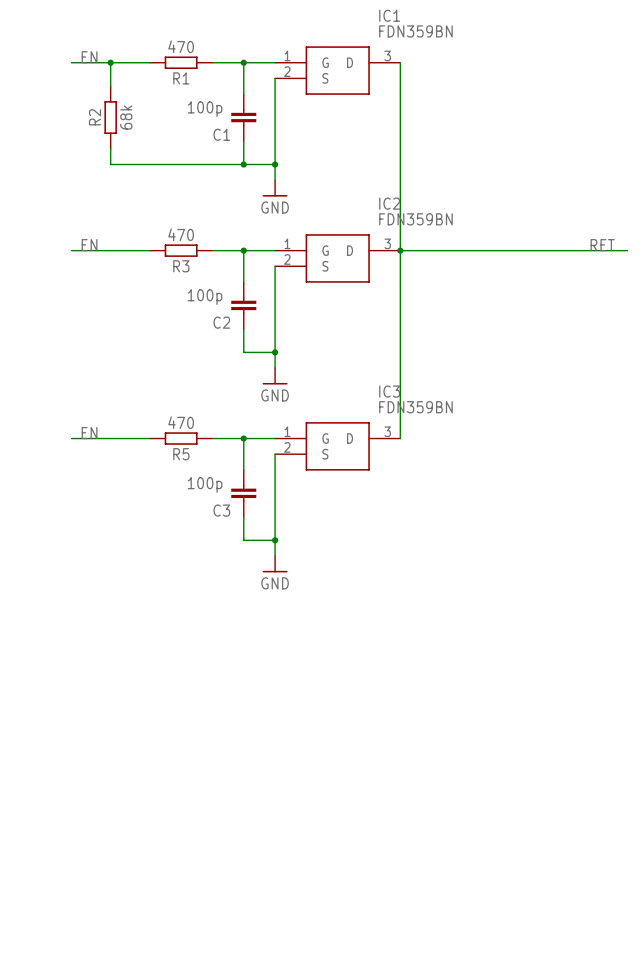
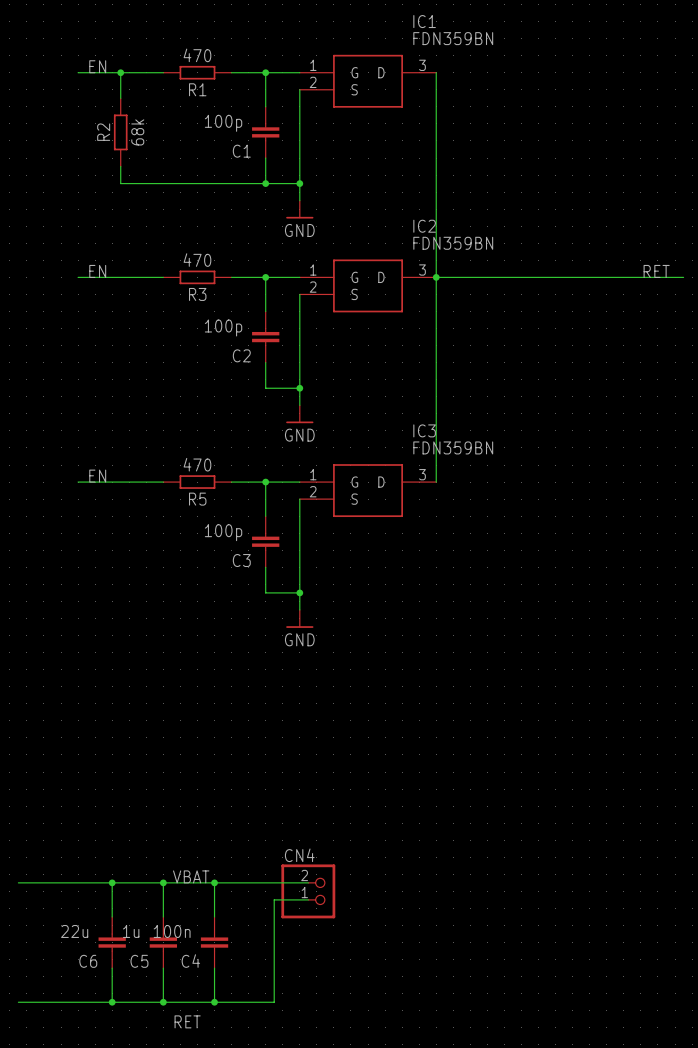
label: none -> VBAT (191, 876)
wire: none -> (18, 882) (308, 882)
wire: none -> (112, 882) (112, 916)
junction: none -> (112, 882)
wire: none -> (163, 882) (163, 916)
junction: none -> (163, 882)
wire: none -> (214, 882) (214, 916)
junction: none -> (214, 882)
CN4: none -> (308, 891)
wire: none -> (308, 899) (274, 899) (274, 1002) (18, 1002)
C6: none -> 22u (112, 942)
C5: none -> 1u (163, 942)
C4: none -> 100n (214, 942)
wire: none -> (112, 968) (112, 1002)
wire: none -> (163, 968) (163, 1002)
wire: none -> (214, 968) (214, 1002)
junction: none -> (112, 1002)
junction: none -> (163, 1002)
junction: none -> (214, 1002)
label: none -> RET (187, 1021)

